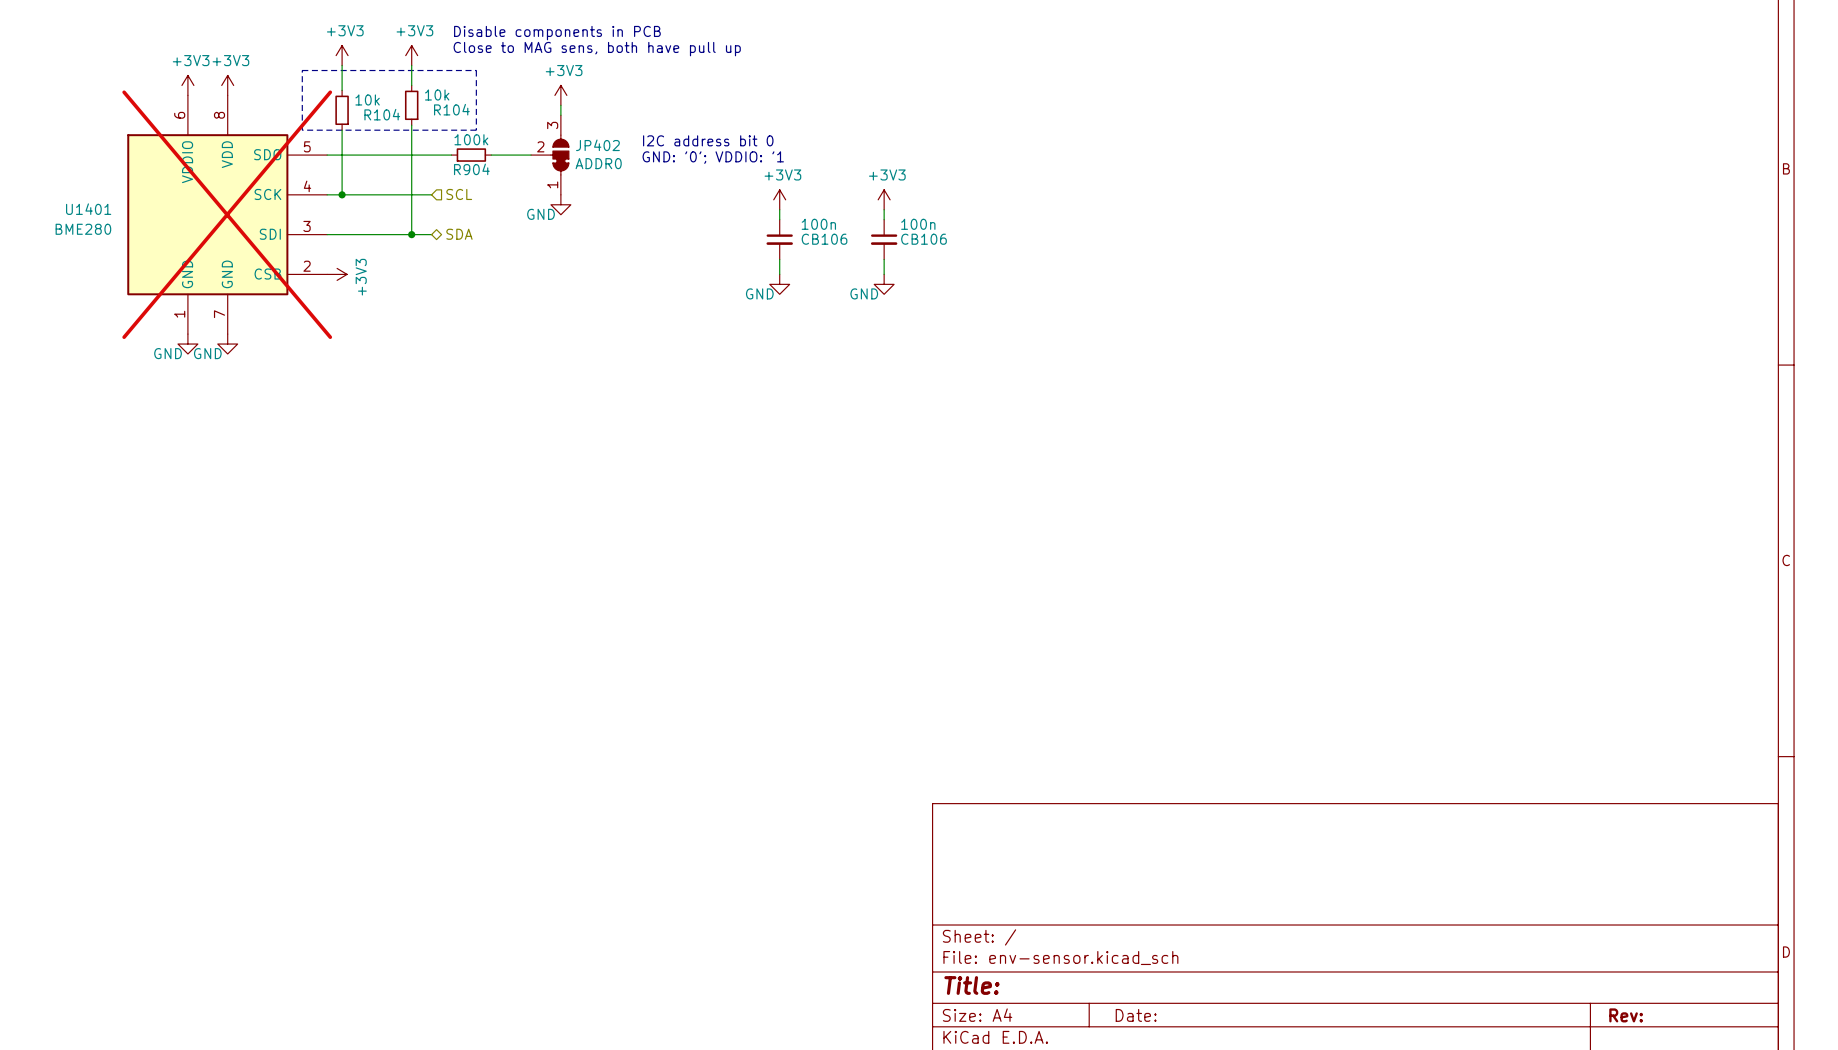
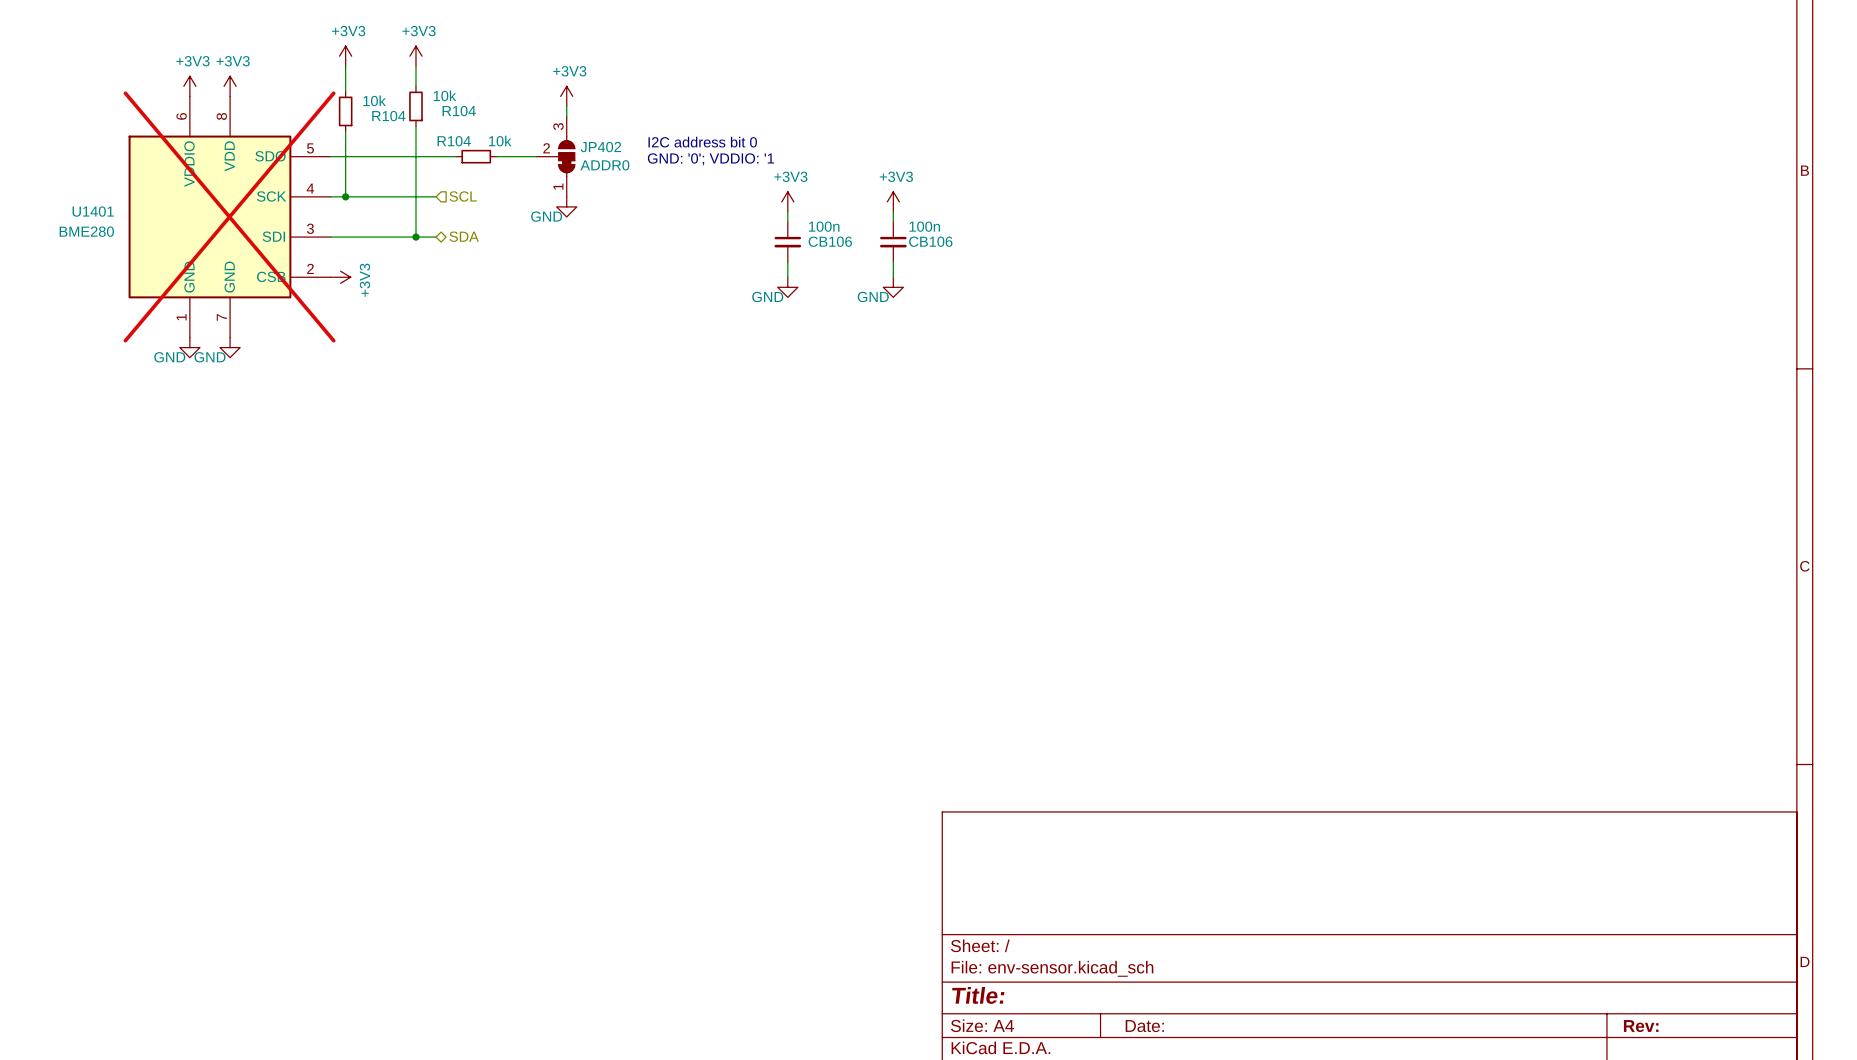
text: Disable components in PCB (557, 33) -> none
text: Close to MAG sens, both have pull up (597, 49) -> none
line: (302, 70) (476, 70) (476, 130) (302, 130) (302, 70) -> none
R904 value: 100k (471, 139) -> 10k (500, 141)
R904 name: R904 (471, 169) -> R104 (454, 141)

